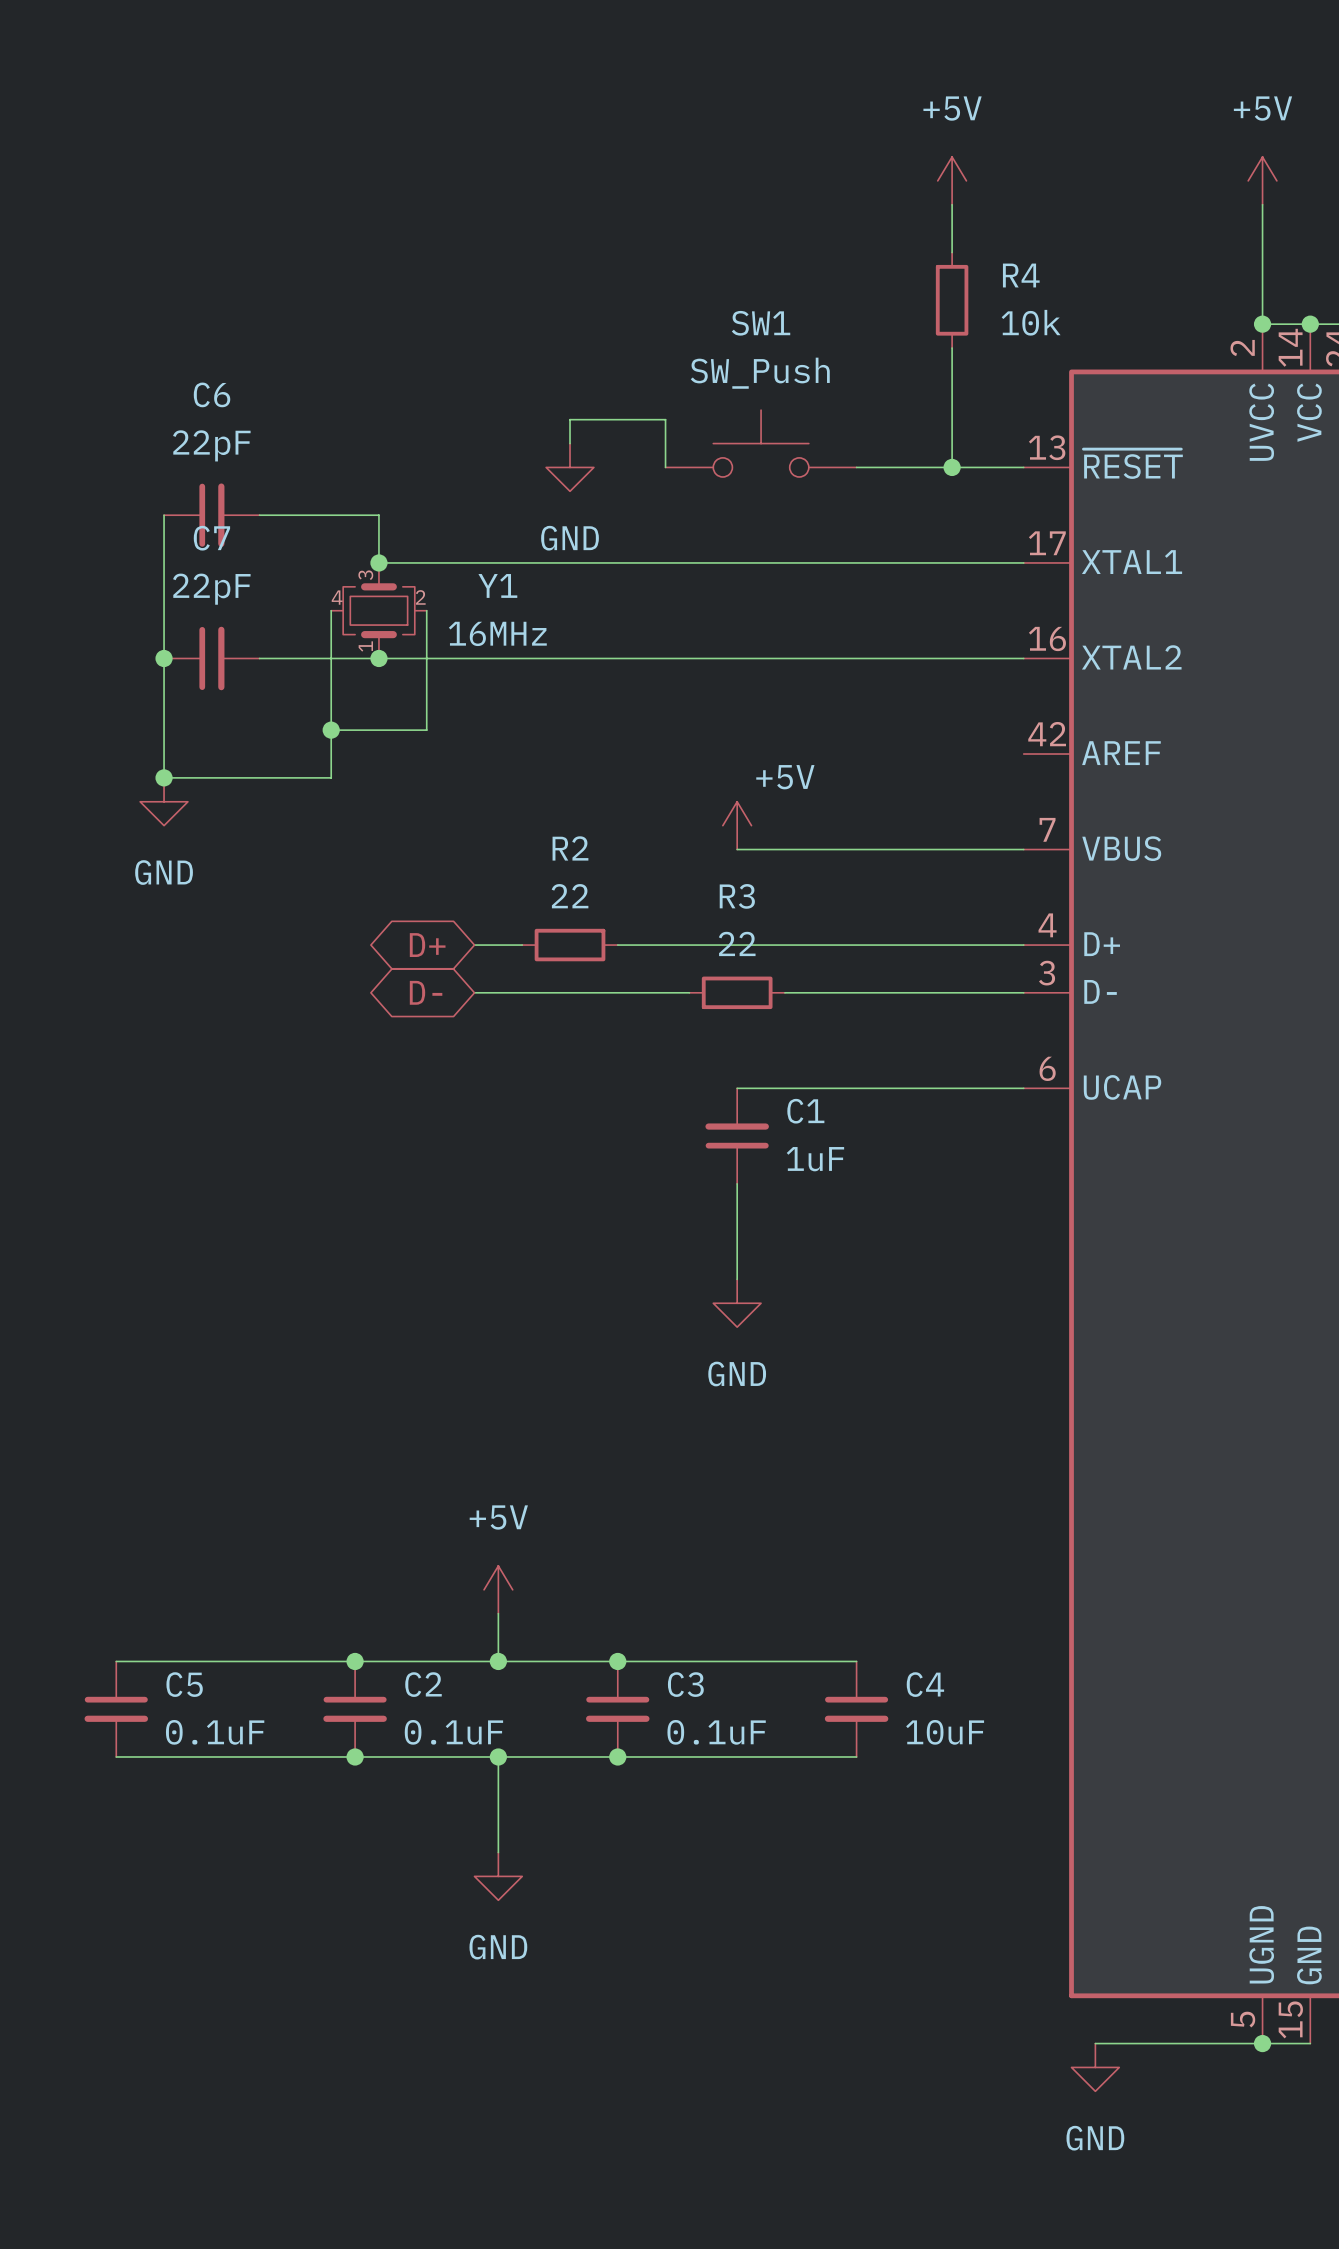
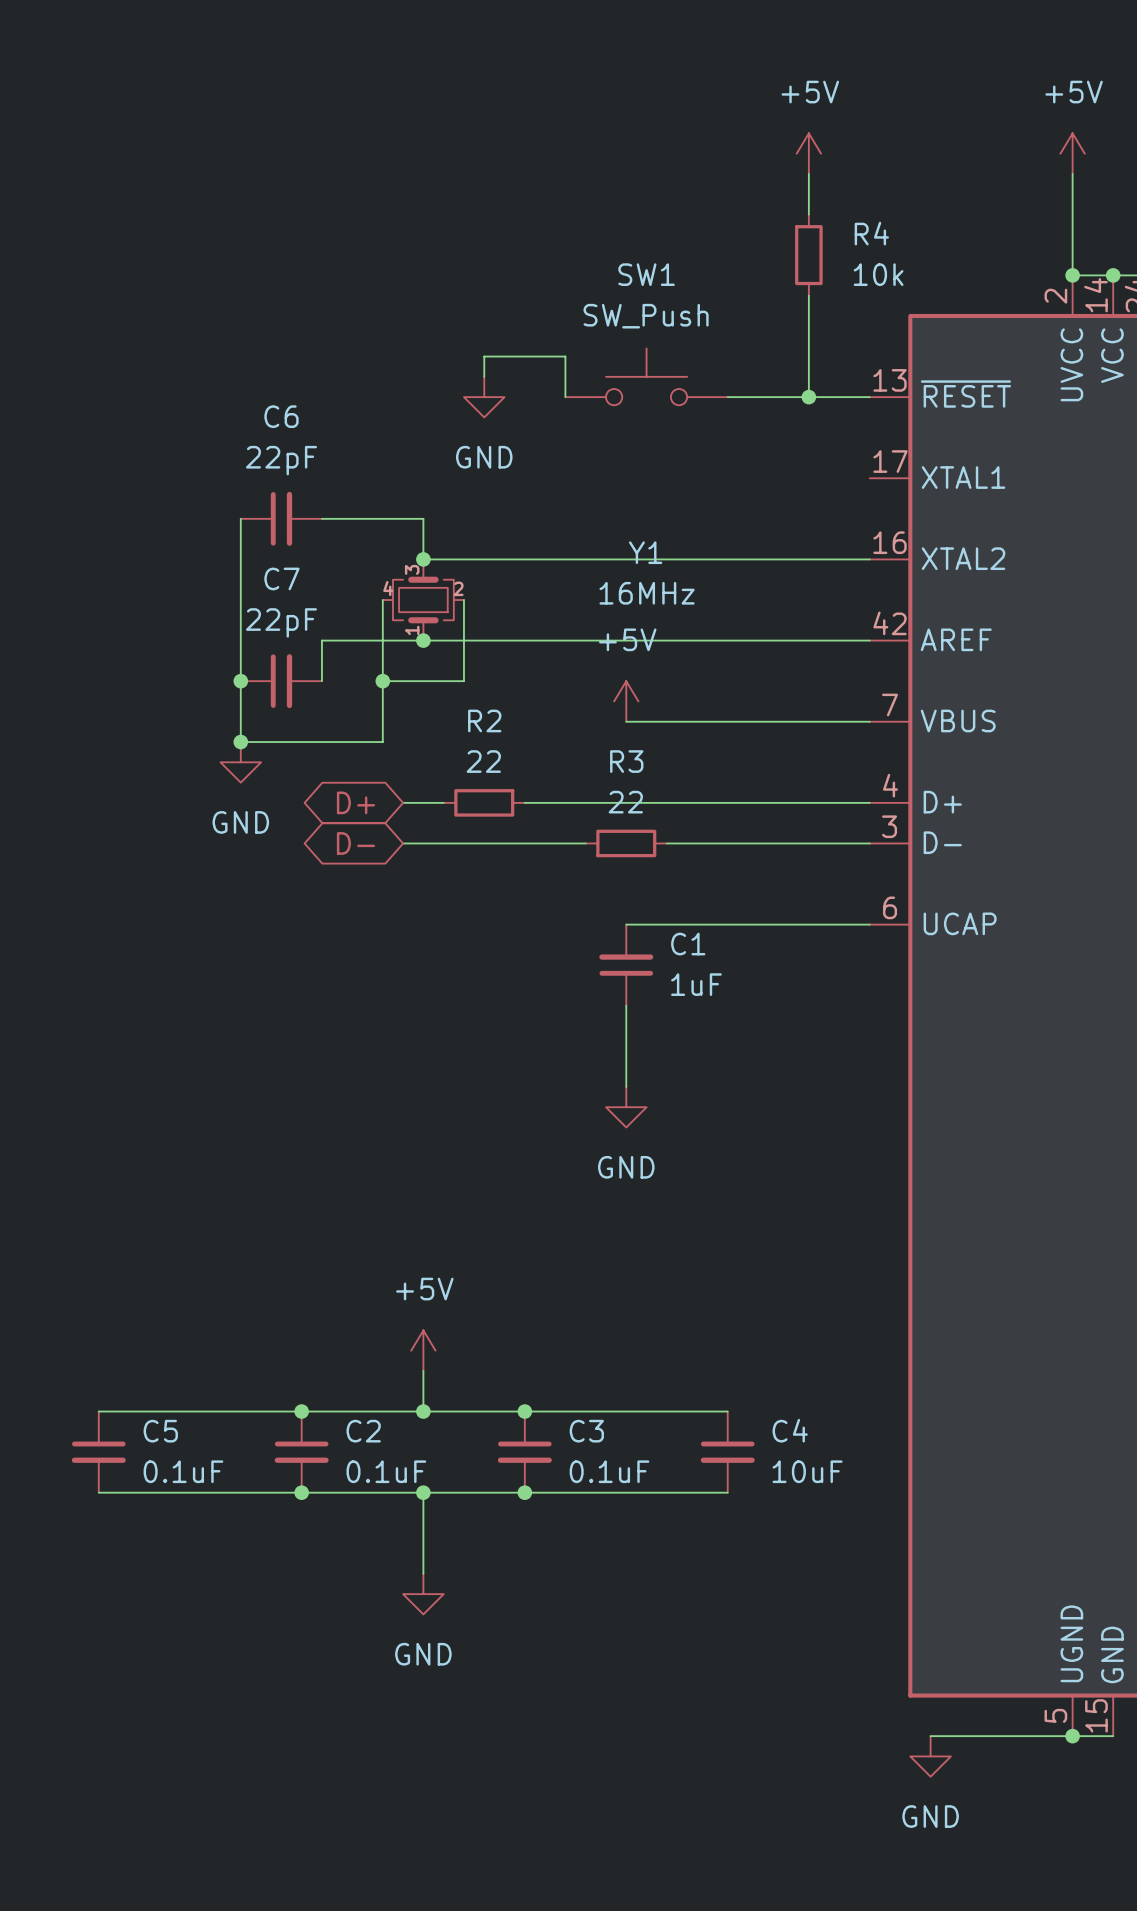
wire: (164, 515) (164, 777) (331, 777) (331, 610) -> (240, 518) (240, 742) (382, 742) (382, 600)
C6 position: (211, 515) -> (281, 518)
wire: (259, 515) (378, 515) (378, 562) (1023, 562) -> none
junction: (378, 562) -> none
Y1 name position: Y1 (497, 585) -> Y1 (645, 552)
Y1 position: (378, 610) -> (423, 600)
wire: (426, 610) (426, 730) (331, 730) -> none
Y1 value position: 16MHz (497, 633) -> 16MHz (647, 593)
junction: (164, 658) -> none
C7 position: (211, 658) -> (281, 681)
wire: (259, 658) (498, 658) -> (321, 518) (423, 518) (423, 559)
junction: (378, 658) -> none
junction: none -> (423, 559)
wire: none -> (463, 600) (463, 681) (382, 681)
junction: (331, 730) -> none
junction: none -> (423, 640)
wire: none -> (869, 640) (321, 640) (321, 681)
junction: (164, 777) -> none
power symbol text position: +5V (785, 777) -> +5V (627, 639)
power symbol position: GND (164, 801) -> GND (240, 762)
junction: none -> (240, 681)
junction: none -> (382, 681)
junction: none -> (240, 742)

